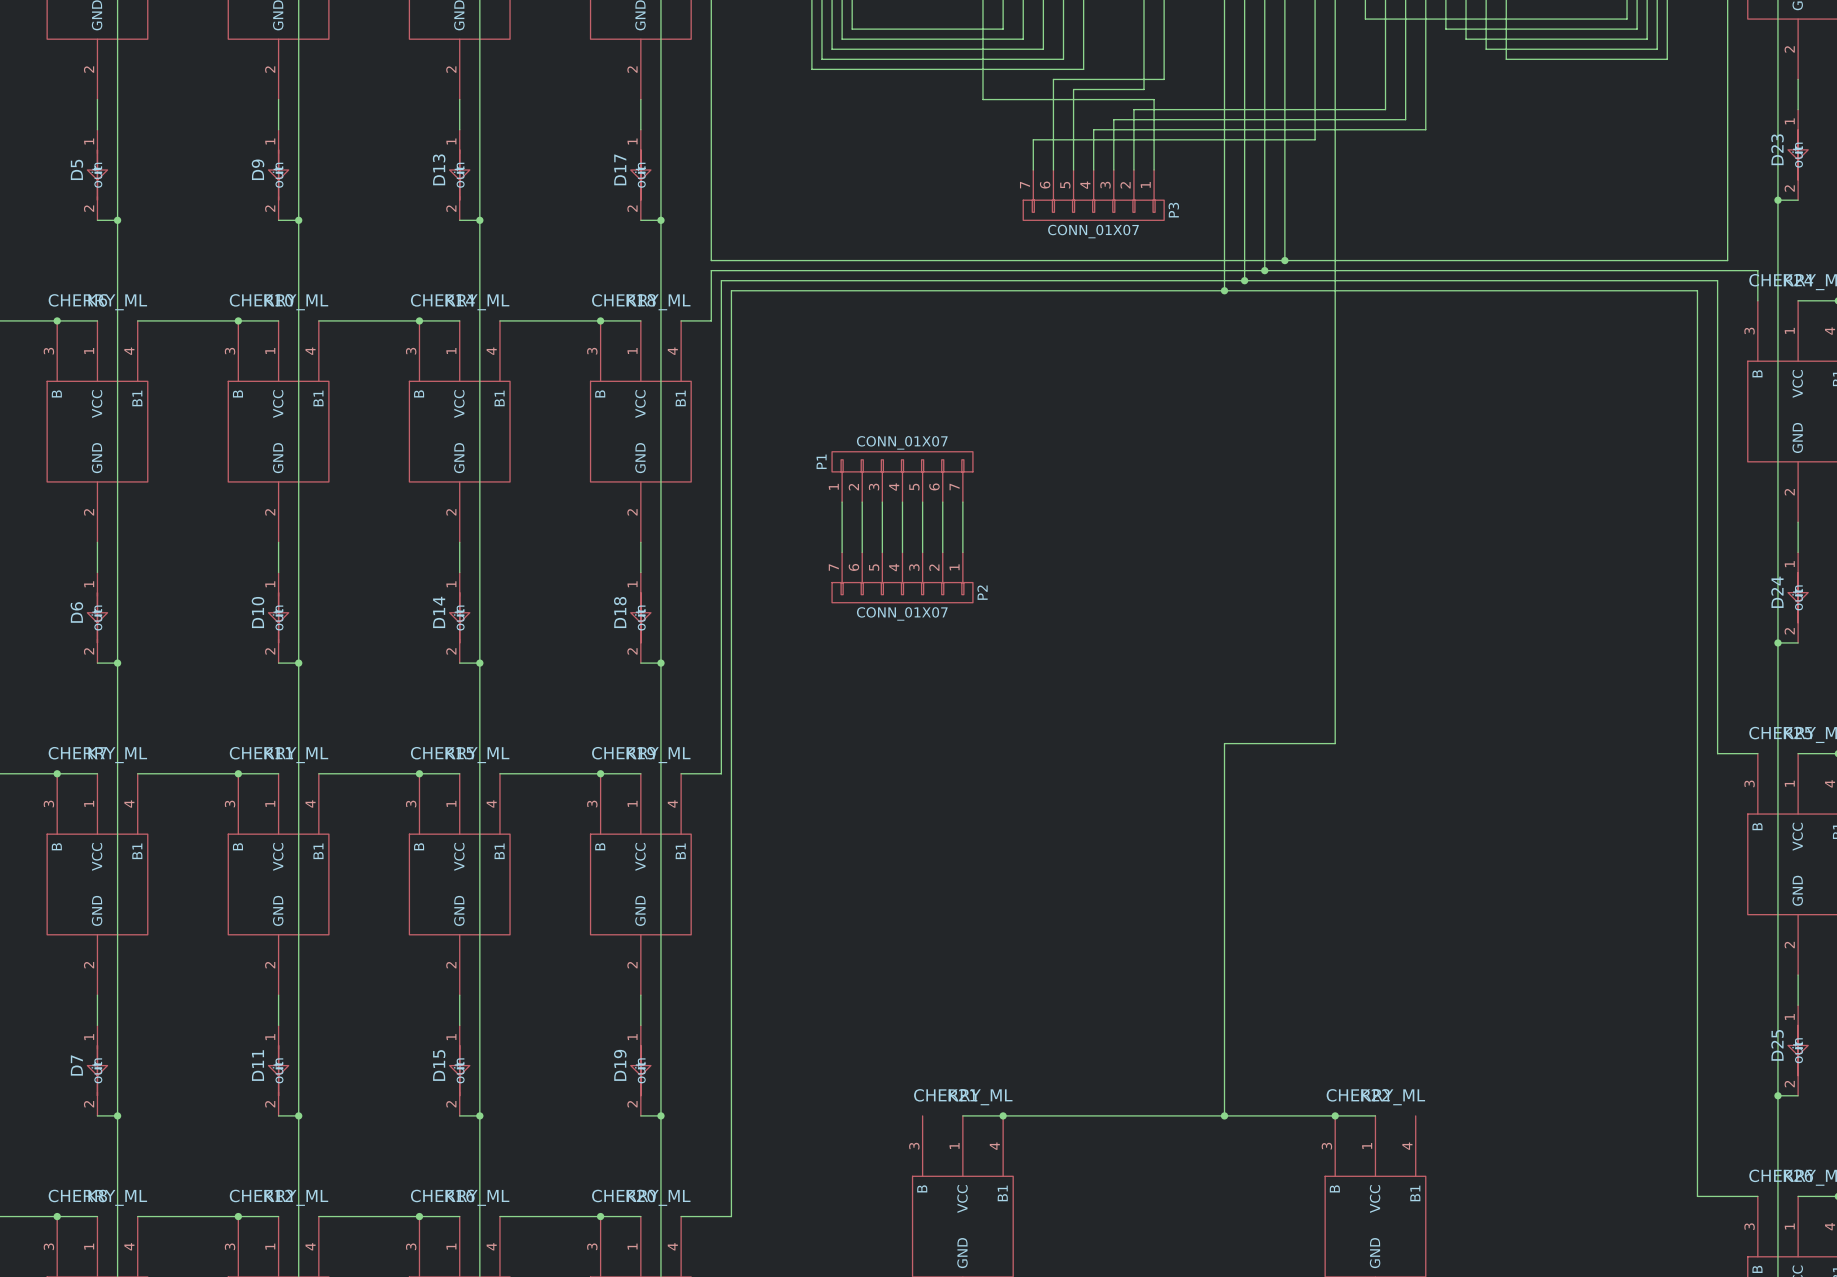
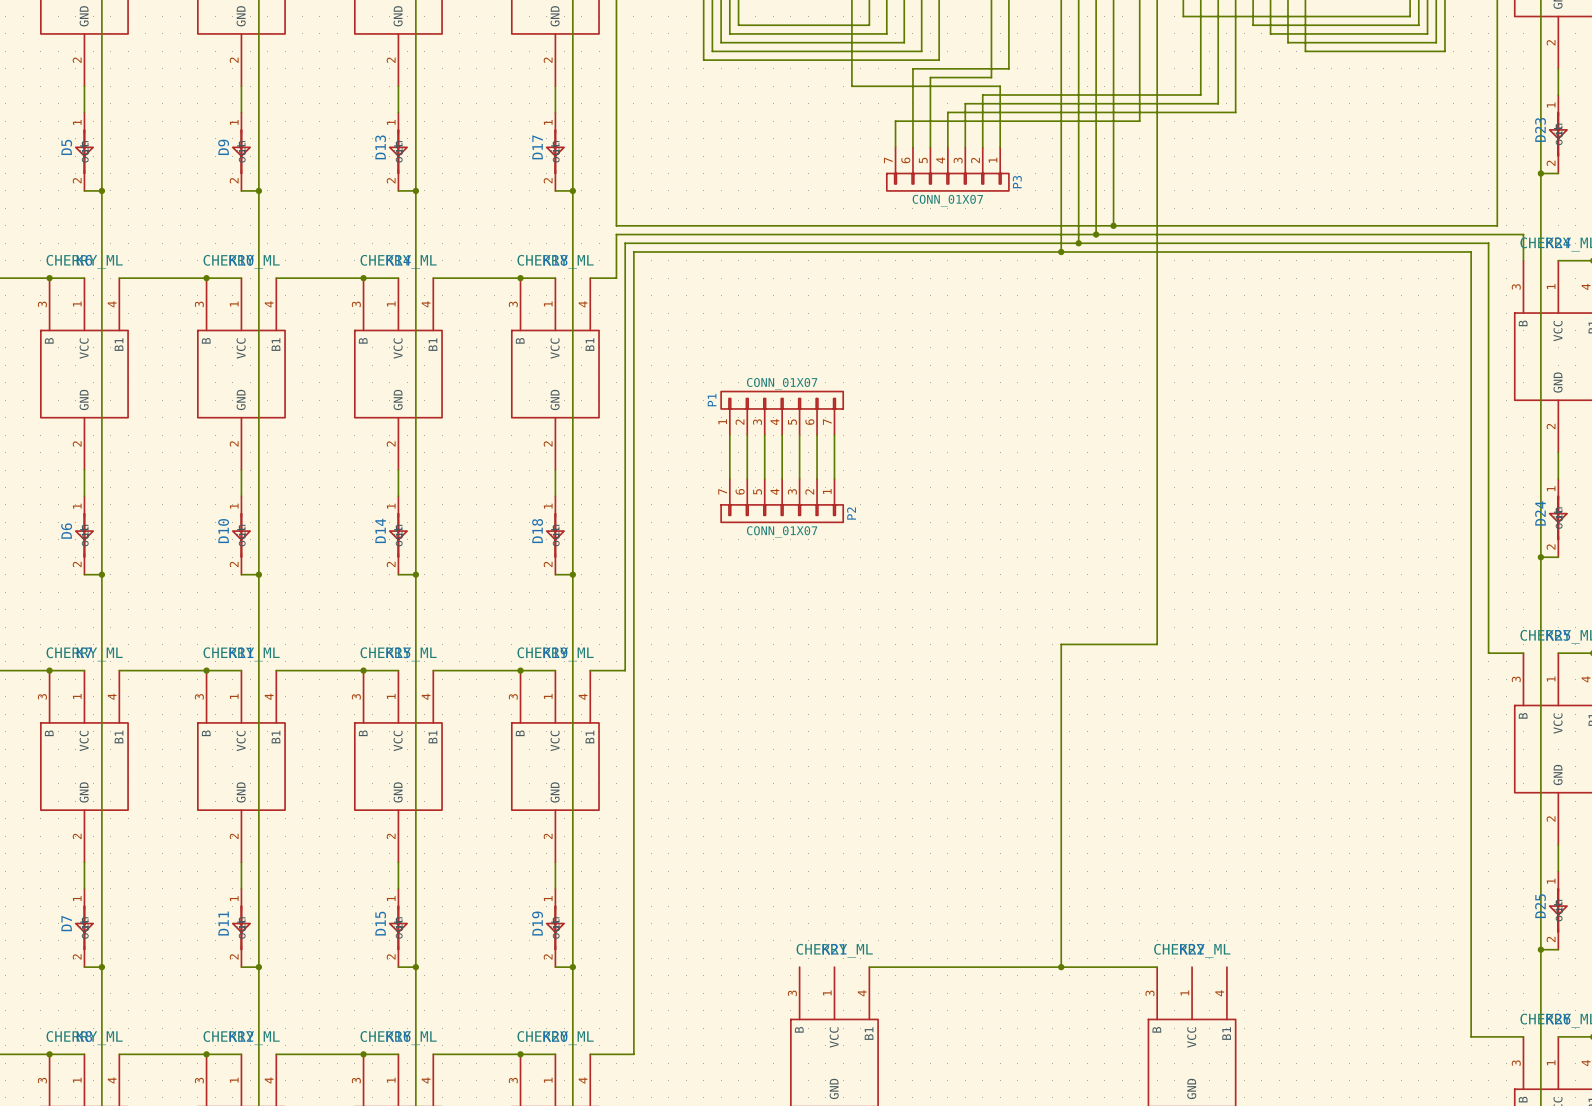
wire: (962, 1115) (1003, 1115) -> none
junction: (1003, 1115) -> none
wire: (1335, 1115) (1375, 1115) -> none
junction: (1335, 1115) -> none

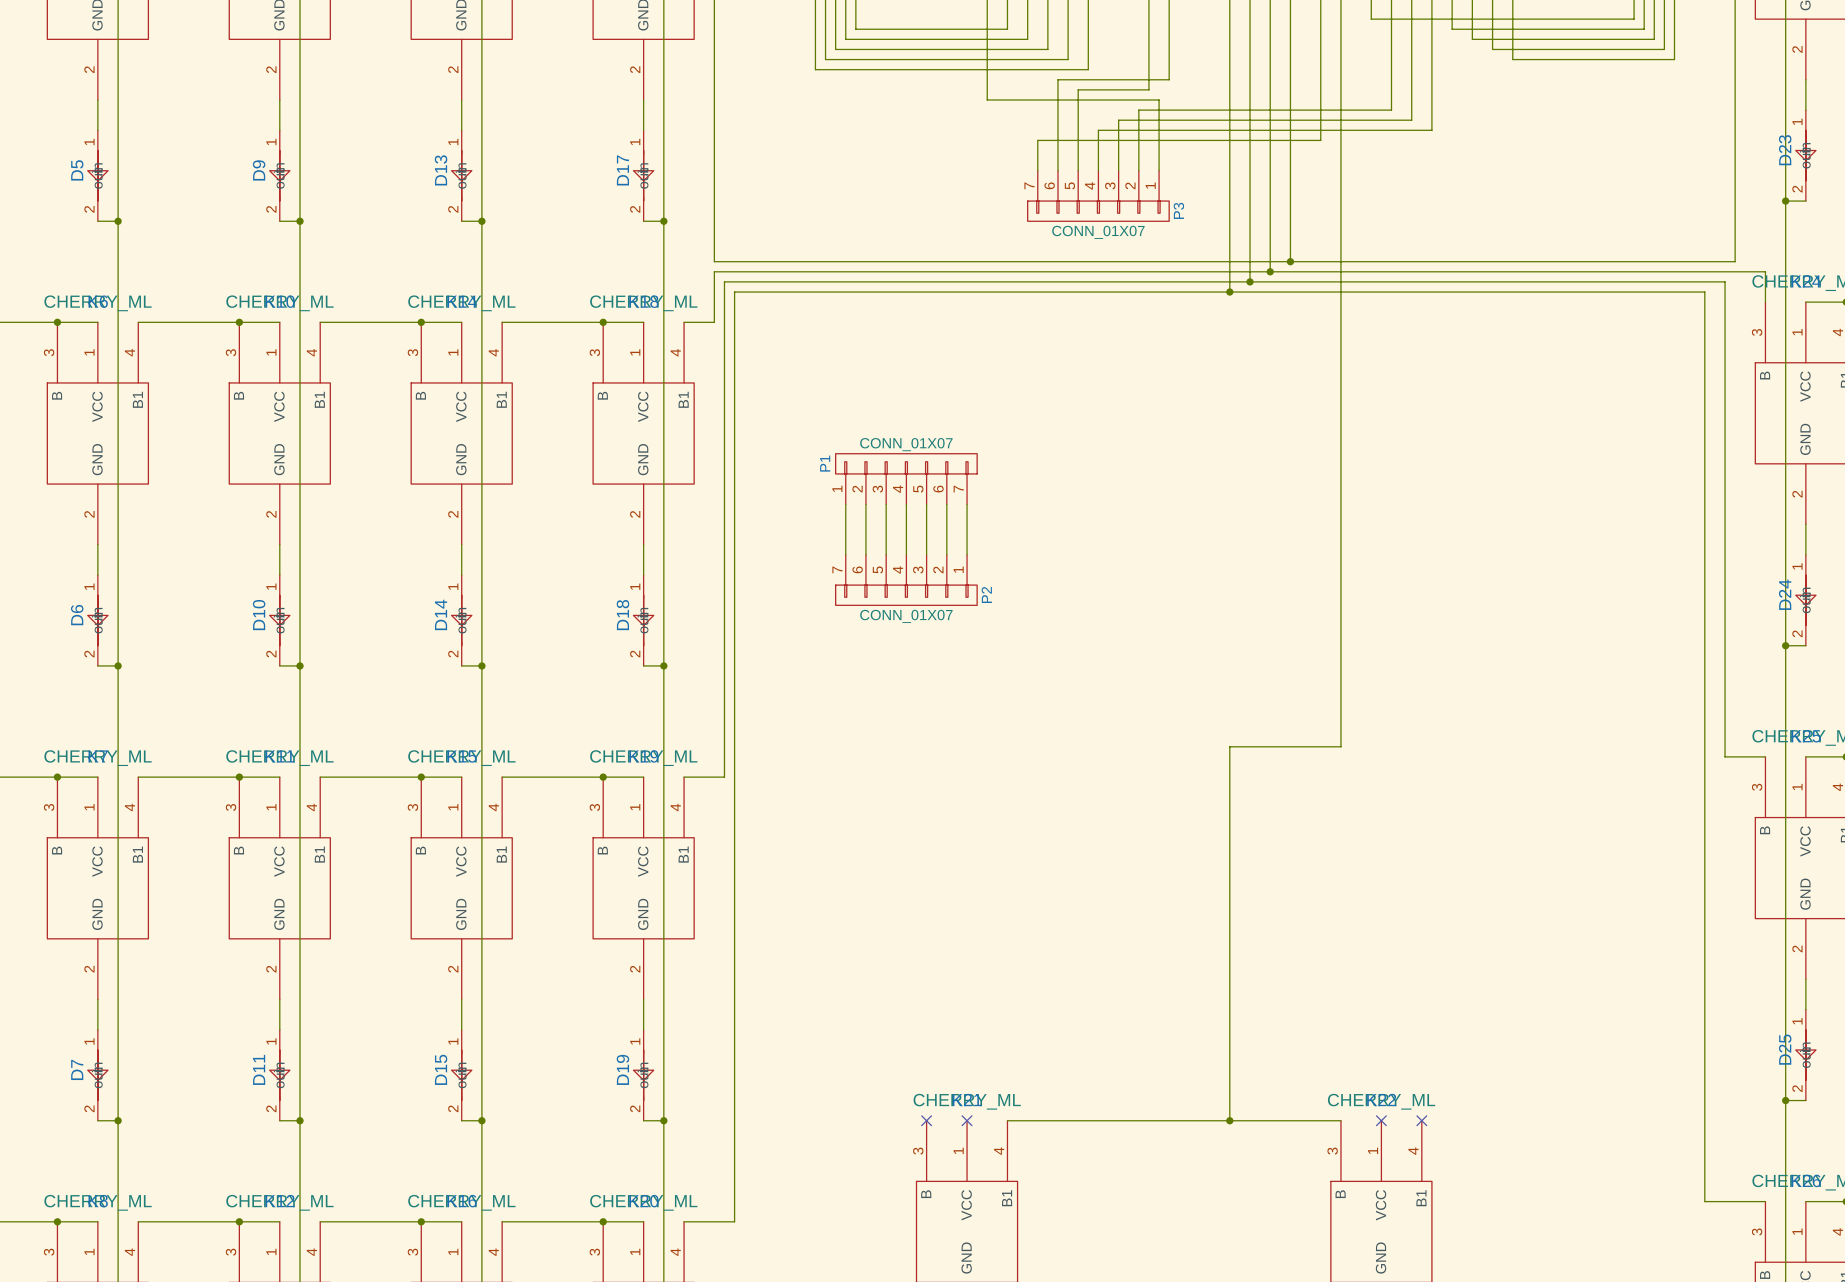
no-connect mark: none -> (926, 1120)
no-connect mark: none -> (967, 1120)
no-connect mark: none -> (1381, 1120)
no-connect mark: none -> (1421, 1120)

